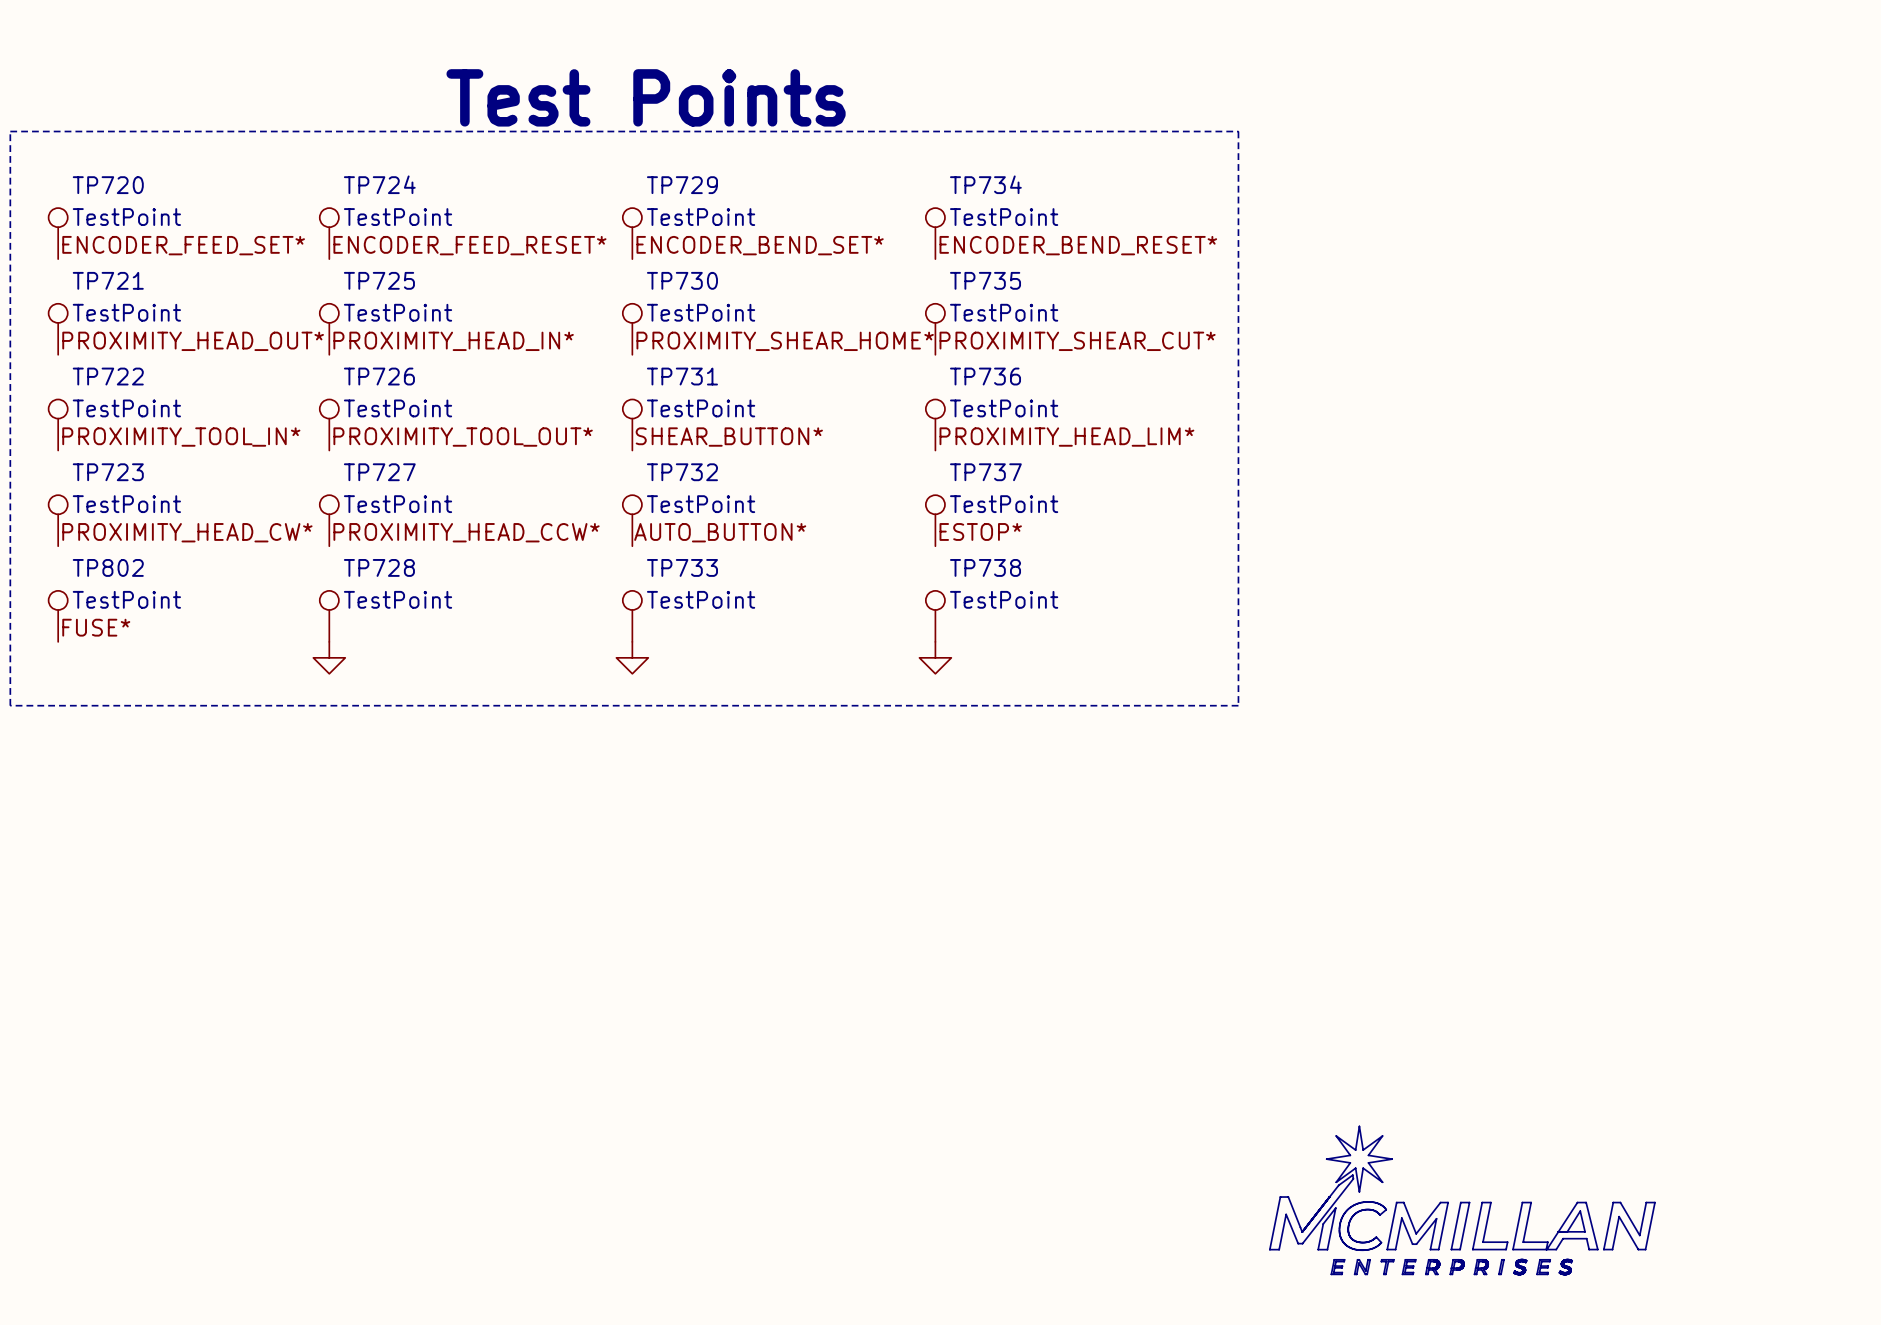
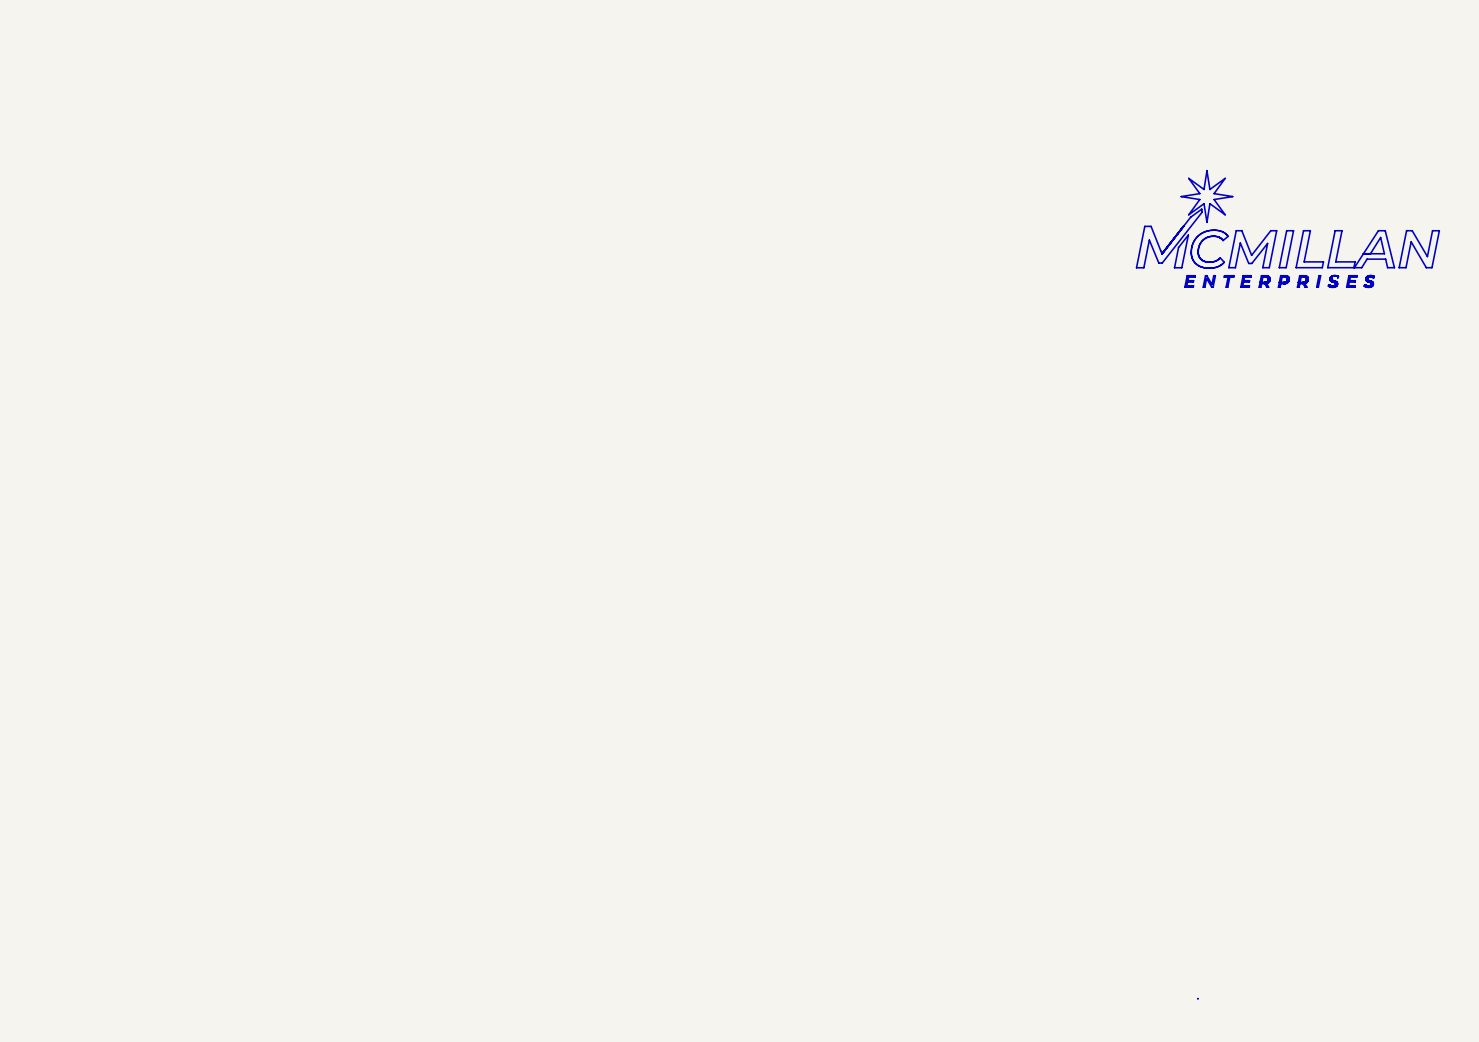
text: Test Points (646, 97) -> none
line: (10, 131) (1238, 131) (1238, 705) (10, 705) (10, 131) -> none
line: none -> (1206, 170) (1204, 189) (1188, 178) (1199, 193) (1181, 196) (1199, 199) (1188, 214) (1204, 203) (1206, 222) (1209, 203) (1225, 214) (1214, 199) (1232, 196) (1214, 193) (1225, 178) (1209, 189) (1206, 170)
TP720: TestPoint (58, 233) -> none
TP724: TestPoint (329, 233) -> none
TP729: TestPoint (632, 233) -> none
TP734: TestPoint (935, 233) -> none
label: ENCODER_FEED_SET* (183, 245) -> none
label: ENCODER_FEED_RESET* (469, 245) -> none
label: ENCODER_BEND_SET* (760, 245) -> none
label: ENCODER_BEND_RESET* (1078, 245) -> none
line: none -> (1212, 230) (1199, 235) (1191, 246) (1193, 260) (1203, 267) (1215, 267) (1224, 262) (1220, 257) (1213, 261) (1205, 261) (1198, 255) (1199, 245) (1205, 238) (1215, 236) (1223, 240) (1228, 236) (1222, 231) (1212, 230)
line: none -> (1236, 230) (1241, 230) (1251, 255) (1270, 230) (1276, 230) (1269, 267) (1262, 267) (1267, 243) (1251, 263) (1248, 263) (1240, 242) (1235, 267) (1228, 267) (1236, 230)
line: none -> (1286, 230) (1293, 230) (1286, 267) (1279, 267) (1286, 230)
line: none -> (1303, 230) (1310, 230) (1304, 261) (1323, 261) (1322, 267) (1296, 267) (1303, 230)
line: none -> (1335, 230) (1342, 230) (1335, 261) (1355, 261) (1353, 267) (1327, 267) (1335, 230)
line: none -> (1378, 230) (1385, 230) (1394, 267) (1387, 267) (1385, 259) (1367, 259) (1361, 267) (1354, 267) (1378, 230)
line: none -> (1406, 230) (1412, 230) (1427, 256) (1432, 230) (1439, 230) (1431, 267) (1426, 267) (1411, 241) (1405, 267) (1399, 267) (1406, 230)
line: none -> (1188, 235) (1178, 247) (1174, 267) (1181, 267) (1188, 235)
line: none -> (1162, 253) (1190, 217) (1201, 209) (1202, 212) (1162, 263) (1158, 263) (1149, 240) (1143, 267) (1136, 267) (1144, 226) (1151, 226) (1162, 253)
line: none -> (1363, 253) (1384, 253) (1380, 237) (1370, 253)
TP721: TestPoint (58, 329) -> none
TP725: TestPoint (329, 329) -> none
TP730: TestPoint (632, 329) -> none
TP735: TestPoint (935, 329) -> none
label: PROXIMITY_HEAD_OUT* (193, 341) -> none
label: PROXIMITY_HEAD_IN* (453, 341) -> none
label: PROXIMITY_SHEAR_HOME* (785, 341) -> none
label: PROXIMITY_SHEAR_CUT* (1077, 341) -> none
line: none -> (1187, 275) (1195, 275) (1188, 277) (1187, 280) (1193, 280) (1187, 282) (1186, 285) (1193, 287) (1184, 287) (1187, 275)
line: none -> (1205, 275) (1211, 284) (1213, 275) (1215, 275) (1213, 287) (1206, 278) (1204, 287) (1203, 287) (1205, 275)
line: none -> (1224, 275) (1234, 275) (1229, 277) (1227, 287) (1226, 287) (1228, 277) (1224, 275)
line: none -> (1243, 275) (1251, 275) (1244, 277) (1243, 280) (1249, 280) (1243, 282) (1242, 285) (1249, 287) (1240, 287) (1243, 275)
line: none -> (1318, 275) (1320, 275) (1318, 287) (1316, 287) (1318, 275)
line: none -> (1348, 275) (1346, 287) (1354, 287) (1348, 285) (1349, 282) (1355, 280) (1349, 280) (1350, 277) (1357, 275) (1348, 275)
line: none -> (1267, 276) (1261, 275) (1260, 282)
line: none -> (1286, 276) (1280, 275) (1279, 282)
line: none -> (1305, 276) (1299, 275) (1298, 282)
line: none -> (1331, 276) (1336, 275) (1337, 277)
line: none -> (1367, 276) (1372, 275) (1373, 277)
line: none -> (1265, 277) (1262, 277) (1261, 282)
line: none -> (1284, 277) (1282, 277) (1281, 282)
line: none -> (1303, 277) (1301, 277) (1300, 282)
line: none -> (1368, 277) (1373, 277)
line: none -> (1269, 279) (1269, 279)
line: none -> (1289, 279) (1287, 282) (1280, 283) (1278, 287) (1279, 282)
line: none -> (1308, 279) (1308, 279)
line: none -> (1330, 278) (1335, 283)
line: none -> (1365, 278) (1371, 283)
line: none -> (1331, 279) (1337, 284)
line: none -> (1367, 279) (1373, 284)
line: none -> (1266, 282) (1260, 282)
line: none -> (1285, 282) (1279, 282)
line: none -> (1304, 282) (1298, 282)
line: none -> (1260, 282) (1259, 287) (1261, 283) (1268, 287) (1266, 283) (1267, 282)
line: none -> (1298, 282) (1297, 287) (1299, 283) (1306, 287) (1304, 283) (1306, 282)
line: none -> (1335, 285) (1328, 285) (1336, 286)
line: none -> (1371, 285) (1364, 285) (1372, 286)
TP722: TestPoint (58, 424) -> none
TP726: TestPoint (329, 424) -> none
TP731: TestPoint (632, 424) -> none
TP736: TestPoint (935, 424) -> none
label: PROXIMITY_TOOL_IN* (181, 437) -> none
label: PROXIMITY_TOOL_OUT* (463, 437) -> none
label: SHEAR_BUTTON* (729, 437) -> none
label: PROXIMITY_HEAD_LIM* (1066, 437) -> none
TP723: TestPoint (58, 520) -> none
TP727: TestPoint (329, 520) -> none
TP732: TestPoint (632, 520) -> none
TP737: TestPoint (935, 520) -> none
label: ESTOP* (980, 531) -> none
label: PROXIMITY_HEAD_CW* (187, 532) -> none
label: PROXIMITY_HEAD_CCW* (466, 532) -> none
label: AUTO_BUTTON* (720, 532) -> none
TP802: TestPoint (58, 616) -> none
TP728: TestPoint (329, 616) -> none
TP733: TestPoint (632, 616) -> none
TP738: TestPoint (935, 616) -> none
label: FUSE* (96, 627) -> none
power symbol: (329, 657) -> none
power symbol: (632, 657) -> none
power symbol: (935, 657) -> none
line: (1359, 1126) (1355, 1150) (1336, 1135) (1350, 1155) (1326, 1159) (1350, 1162) (1336, 1182) (1355, 1168) (1359, 1191) (1363, 1168) (1382, 1182) (1368, 1162) (1392, 1159) (1368, 1155) (1382, 1135) (1363, 1150) (1359, 1126) -> none
line: (1366, 1201) (1357, 1203) (1349, 1208) (1340, 1222) (1339, 1232) (1341, 1240) (1347, 1245) (1354, 1249) (1370, 1249) (1381, 1242) (1376, 1237) (1367, 1242) (1357, 1241) (1348, 1234) (1349, 1221) (1357, 1212) (1369, 1209) (1379, 1215) (1386, 1209) (1379, 1203) (1366, 1201) -> none
line: (1396, 1202) (1403, 1202) (1416, 1233) (1440, 1202) (1448, 1202) (1438, 1249) (1430, 1249) (1436, 1218) (1416, 1244) (1412, 1244) (1401, 1218) (1395, 1249) (1387, 1249) (1396, 1202) -> none
line: (1460, 1202) (1469, 1202) (1460, 1249) (1451, 1249) (1460, 1202) -> none
line: (1482, 1202) (1490, 1202) (1483, 1242) (1507, 1242) (1506, 1249) (1472, 1249) (1482, 1202) -> none
line: (1522, 1202) (1531, 1202) (1523, 1242) (1547, 1242) (1546, 1249) (1513, 1249) (1522, 1202) -> none
line: (1577, 1202) (1586, 1202) (1597, 1249) (1589, 1249) (1586, 1238) (1563, 1238) (1556, 1249) (1546, 1249) (1577, 1202) -> none
line: (1613, 1202) (1620, 1202) (1639, 1235) (1646, 1202) (1654, 1202) (1645, 1249) (1638, 1249) (1619, 1216) (1612, 1249) (1603, 1249) (1613, 1202) -> none
line: (1335, 1208) (1323, 1223) (1318, 1249) (1327, 1249) (1335, 1208) -> none
line: (1558, 1231) (1585, 1231) (1580, 1211) (1567, 1231) -> none
line: (1302, 1232) (1338, 1185) (1352, 1175) (1353, 1178) (1302, 1243) (1298, 1243) (1286, 1214) (1279, 1249) (1269, 1249) (1280, 1197) (1288, 1197) (1302, 1232) -> none
line: (1334, 1259) (1344, 1259) (1344, 1261) (1335, 1261) (1335, 1266) (1342, 1266) (1342, 1267) (1334, 1267) (1333, 1272) (1342, 1272) (1341, 1274) (1331, 1274) (1334, 1259) -> none
line: (1357, 1259) (1365, 1271) (1368, 1259) (1370, 1259) (1367, 1274) (1358, 1263) (1356, 1274) (1354, 1274) (1357, 1259) -> none
line: (1381, 1259) (1393, 1259) (1393, 1261) (1388, 1261) (1385, 1274) (1383, 1274) (1386, 1261) (1381, 1261) (1381, 1259) -> none
line: (1405, 1259) (1415, 1259) (1415, 1261) (1407, 1261) (1406, 1266) (1413, 1266) (1413, 1267) (1405, 1267) (1404, 1272) (1413, 1272) (1413, 1274) (1402, 1274) (1405, 1259) -> none
line: (1501, 1259) (1503, 1259) (1501, 1274) (1498, 1274) (1501, 1259) -> none
line: (1539, 1259) (1537, 1274) (1547, 1274) (1548, 1272) (1539, 1272) (1540, 1267) (1547, 1267) (1548, 1266) (1540, 1266) (1541, 1261) (1549, 1261) (1550, 1259) (1539, 1259) -> none
line: (1436, 1260) (1428, 1259) (1427, 1268) -> none
line: (1461, 1260) (1453, 1259) (1451, 1268) -> none
line: (1485, 1260) (1477, 1259) (1475, 1268) -> none
line: (1517, 1260) (1524, 1259) (1526, 1260) (1525, 1262) -> none
line: (1563, 1260) (1569, 1259) (1572, 1260) (1571, 1262) -> none
line: (1433, 1261) (1430, 1261) (1429, 1268) -> none
line: (1458, 1261) (1454, 1261) (1453, 1268) -> none
line: (1482, 1261) (1479, 1261) (1477, 1268) -> none
line: (1518, 1262) (1525, 1262) -> none
line: (1564, 1262) (1571, 1262) -> none
line: (1515, 1263) (1517, 1266) (1522, 1269) -> none
line: (1561, 1263) (1562, 1266) (1568, 1269) -> none
line: (1439, 1264) (1439, 1265) -> none
line: (1463, 1264) (1461, 1268) (1453, 1269) (1452, 1274) (1450, 1274) (1451, 1268) -> none
line: (1488, 1264) (1488, 1265) -> none
line: (1518, 1264) (1524, 1267) (1525, 1270) -> none
line: (1563, 1264) (1569, 1267) (1570, 1270) -> none
line: (1434, 1267) (1427, 1268) -> none
line: (1459, 1267) (1451, 1268) -> none
line: (1483, 1267) (1475, 1268) -> none
line: (1427, 1268) (1425, 1274) (1427, 1274) (1428, 1269) (1433, 1269) (1435, 1274) (1437, 1274) (1435, 1269) (1437, 1268) -> none
line: (1475, 1268) (1474, 1274) (1476, 1274) (1477, 1269) (1481, 1269) (1484, 1274) (1486, 1274) (1483, 1269) (1485, 1268) -> none
line: (1568, 1269) (1568, 1270) -> none
line: (1522, 1271) (1514, 1271) (1513, 1272) (1523, 1273) -> none
line: (1568, 1271) (1560, 1271) (1559, 1272) (1569, 1273) -> none

